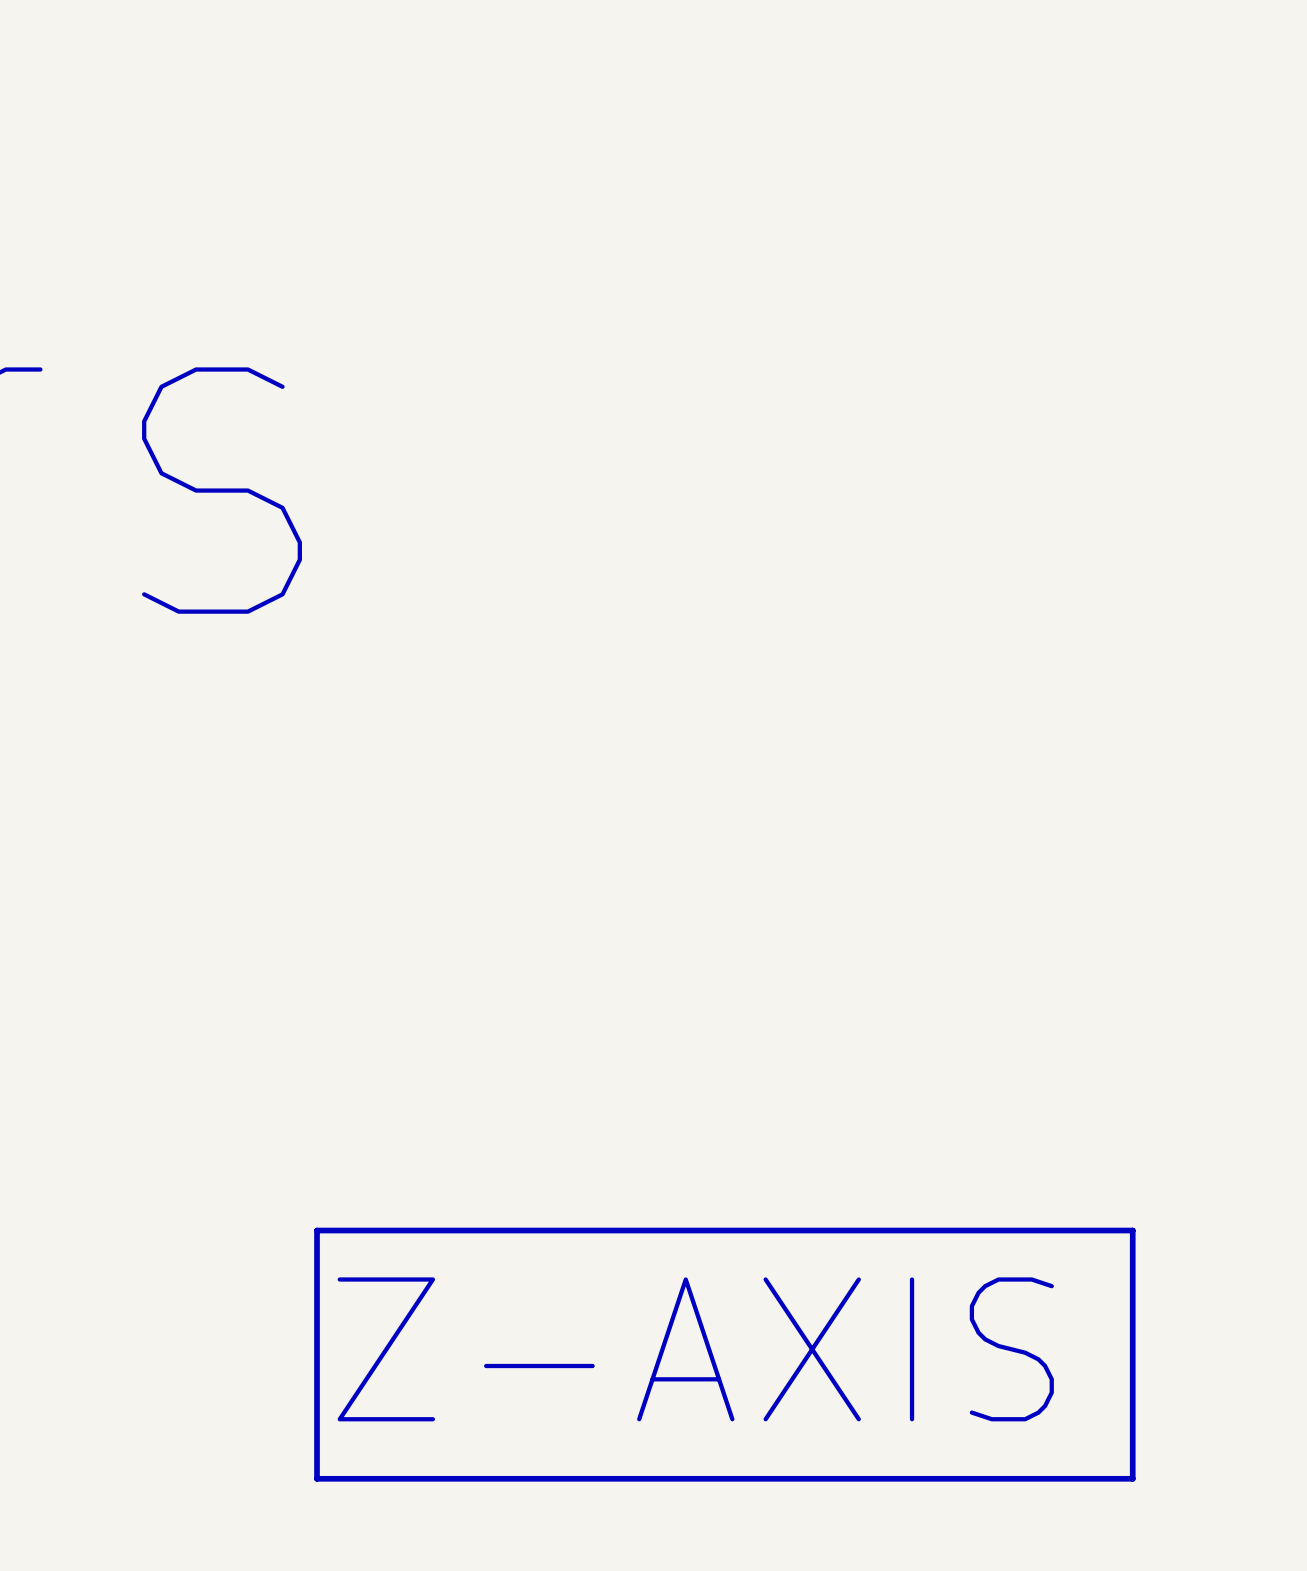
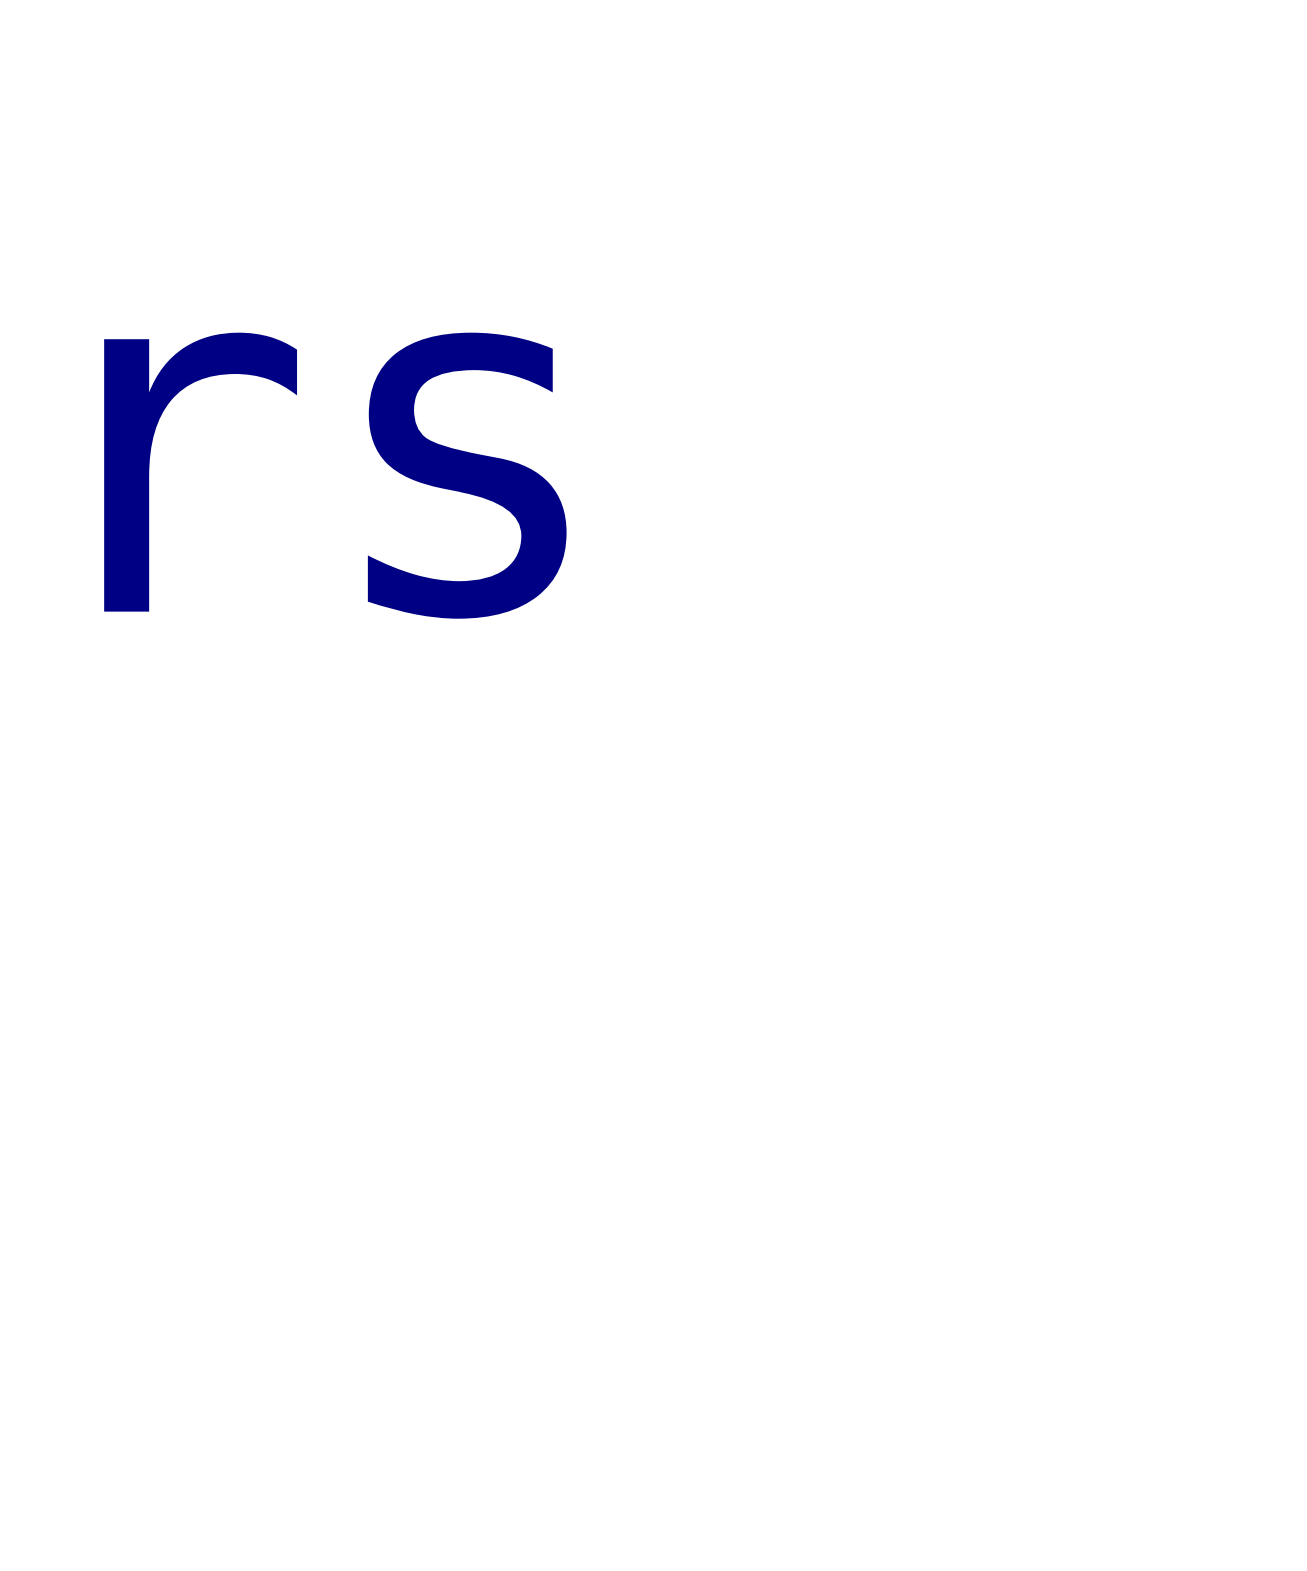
line: (317, 1230) (317, 1478) (1132, 1478) (1132, 1230) (317, 1230) -> none
text: Z-AXIS (695, 1349) -> none

